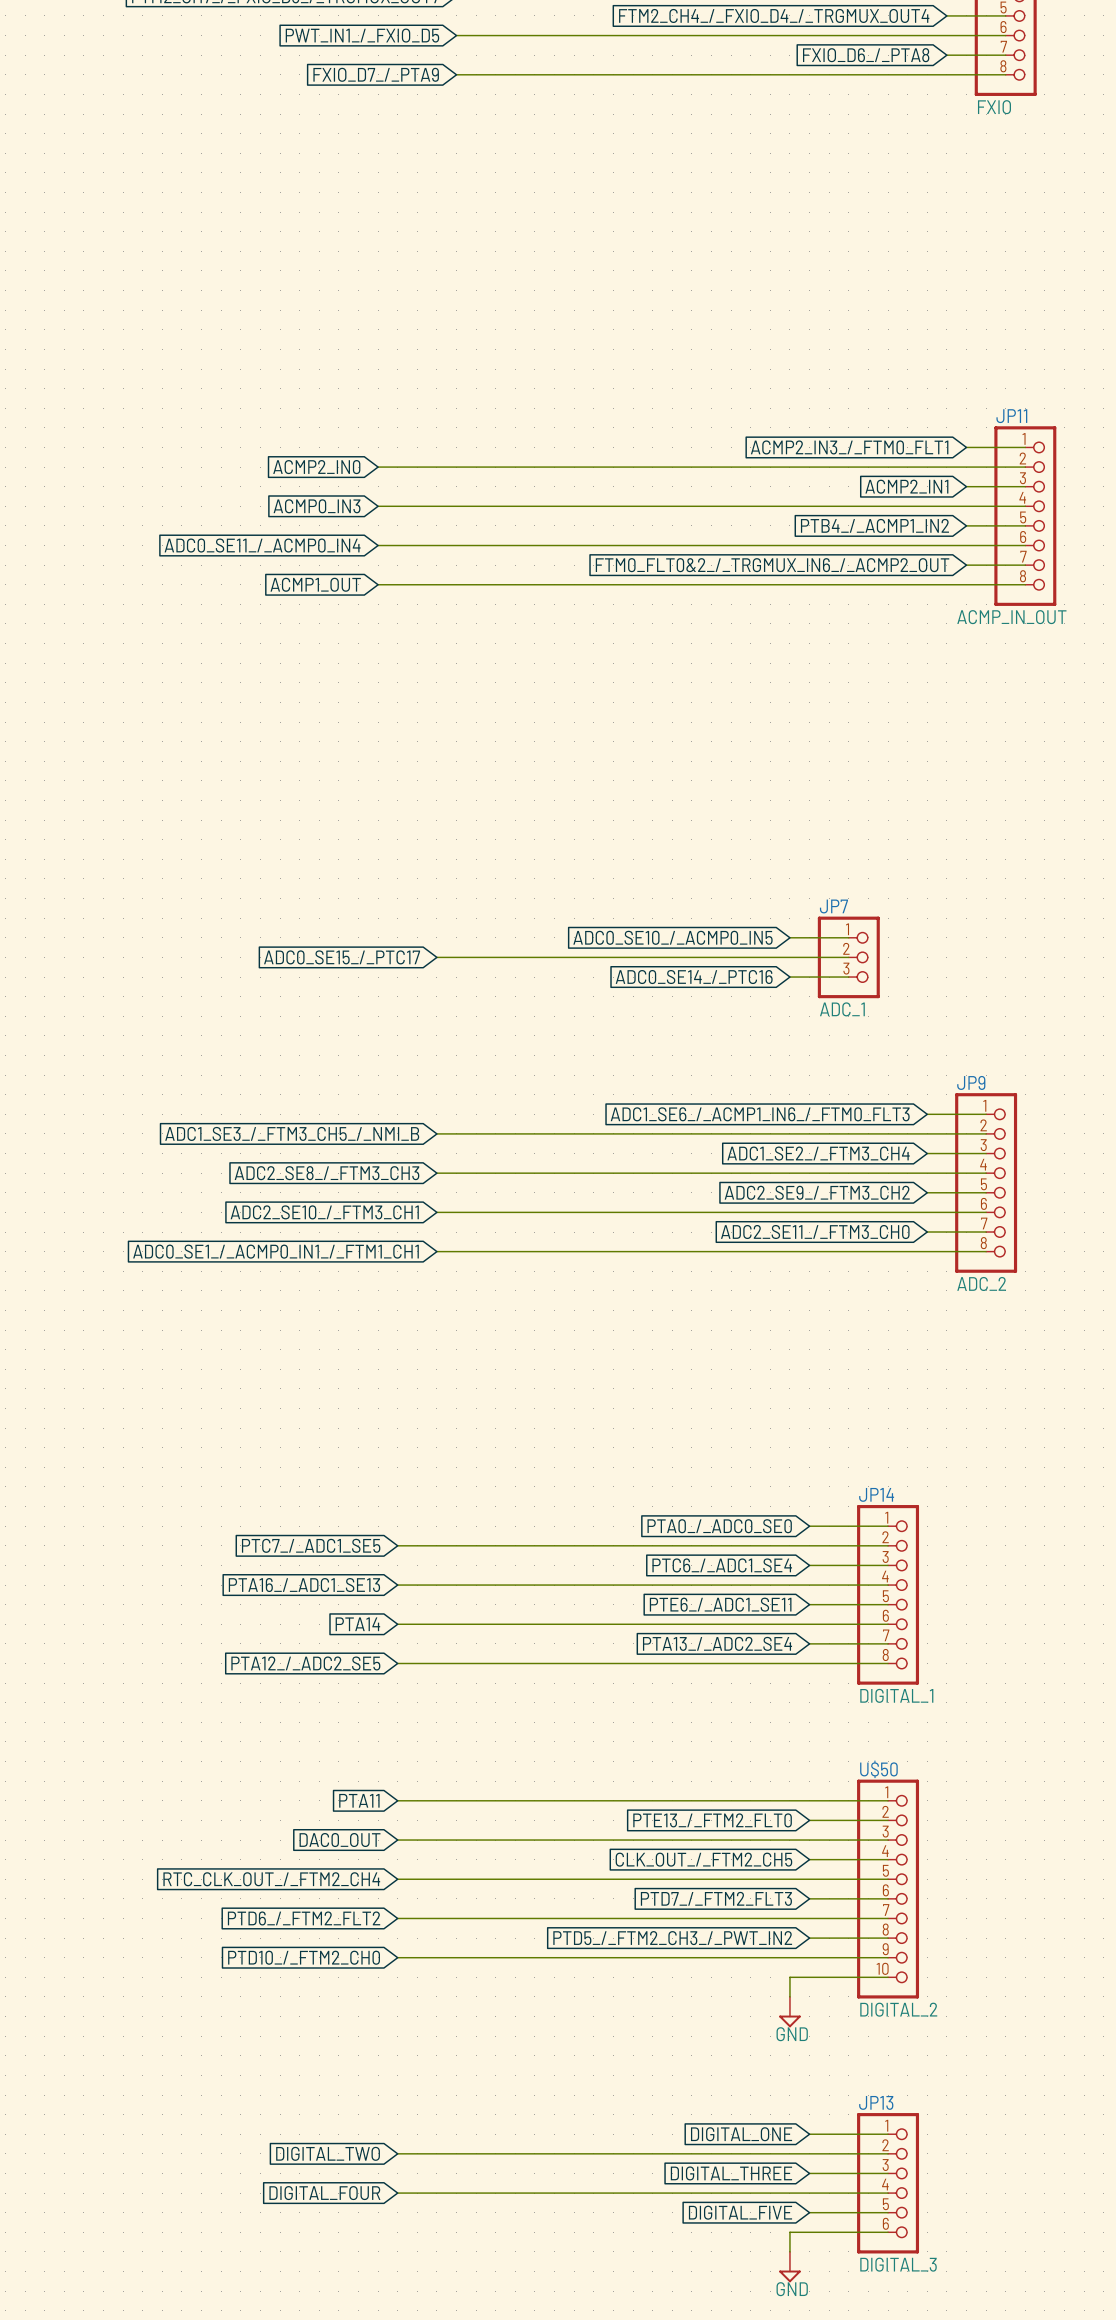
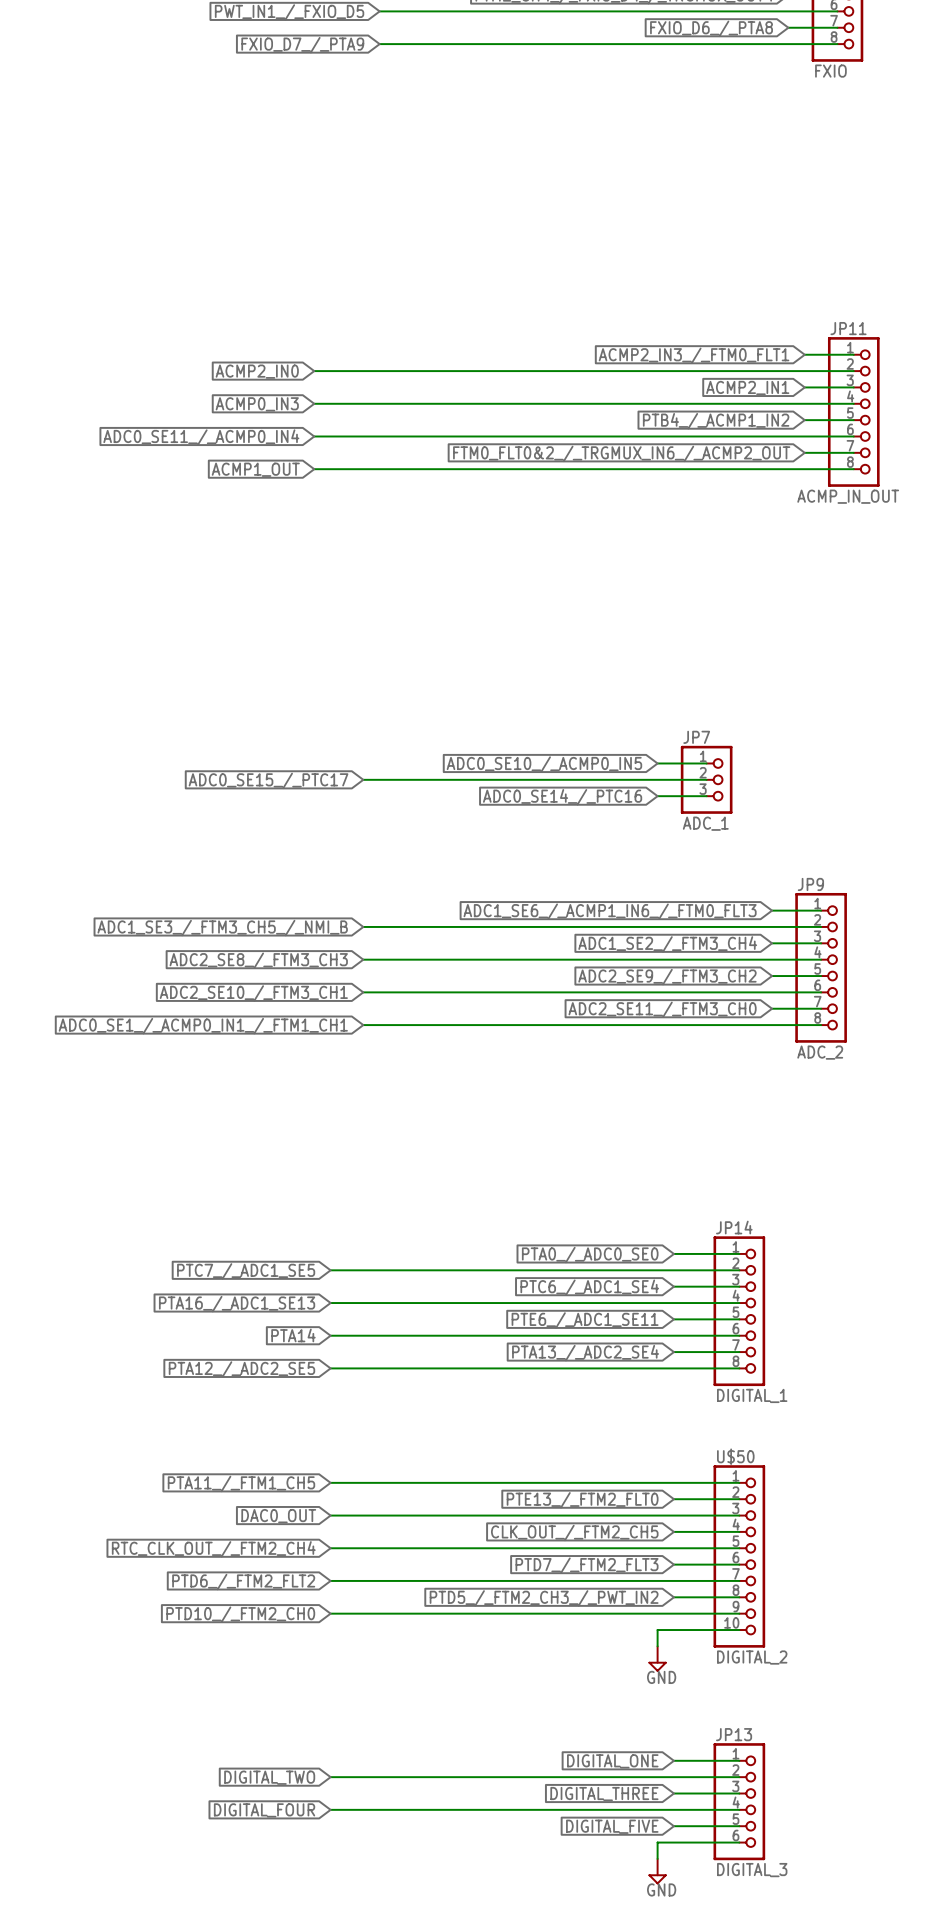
global label: PTA11 (359, 1800) -> PTA11_/_FTM1_CH5 (241, 1483)

